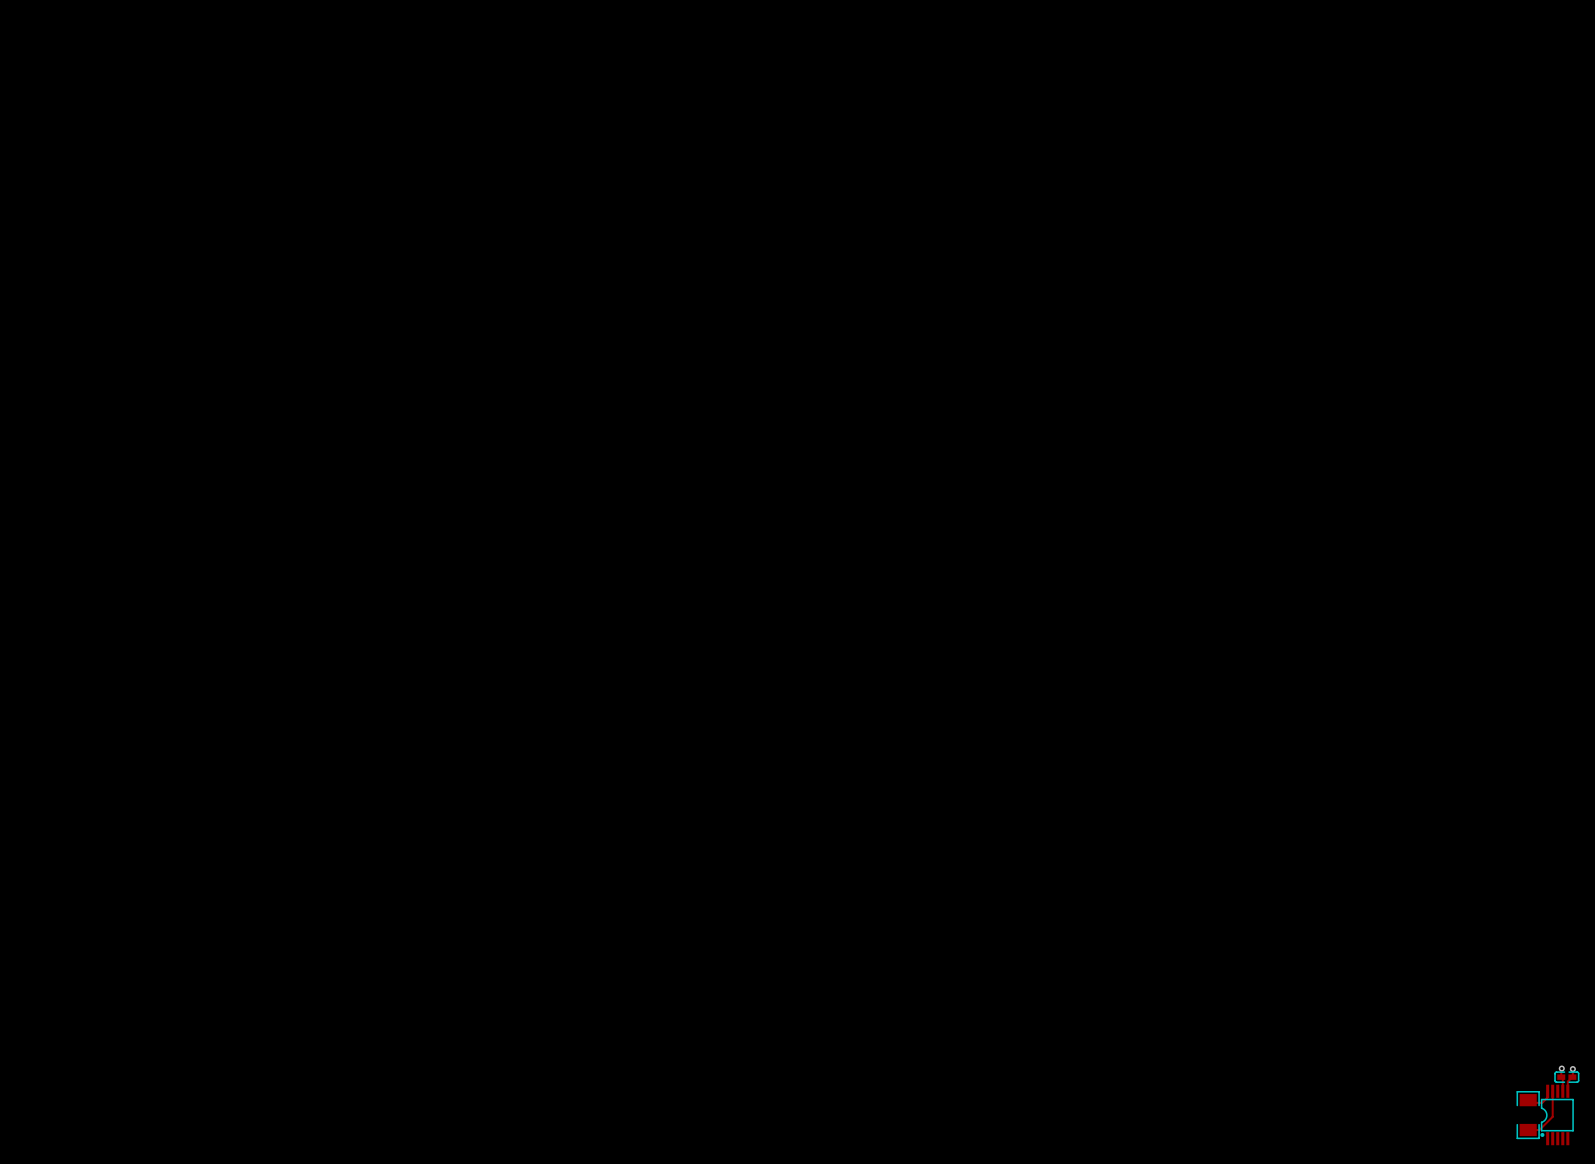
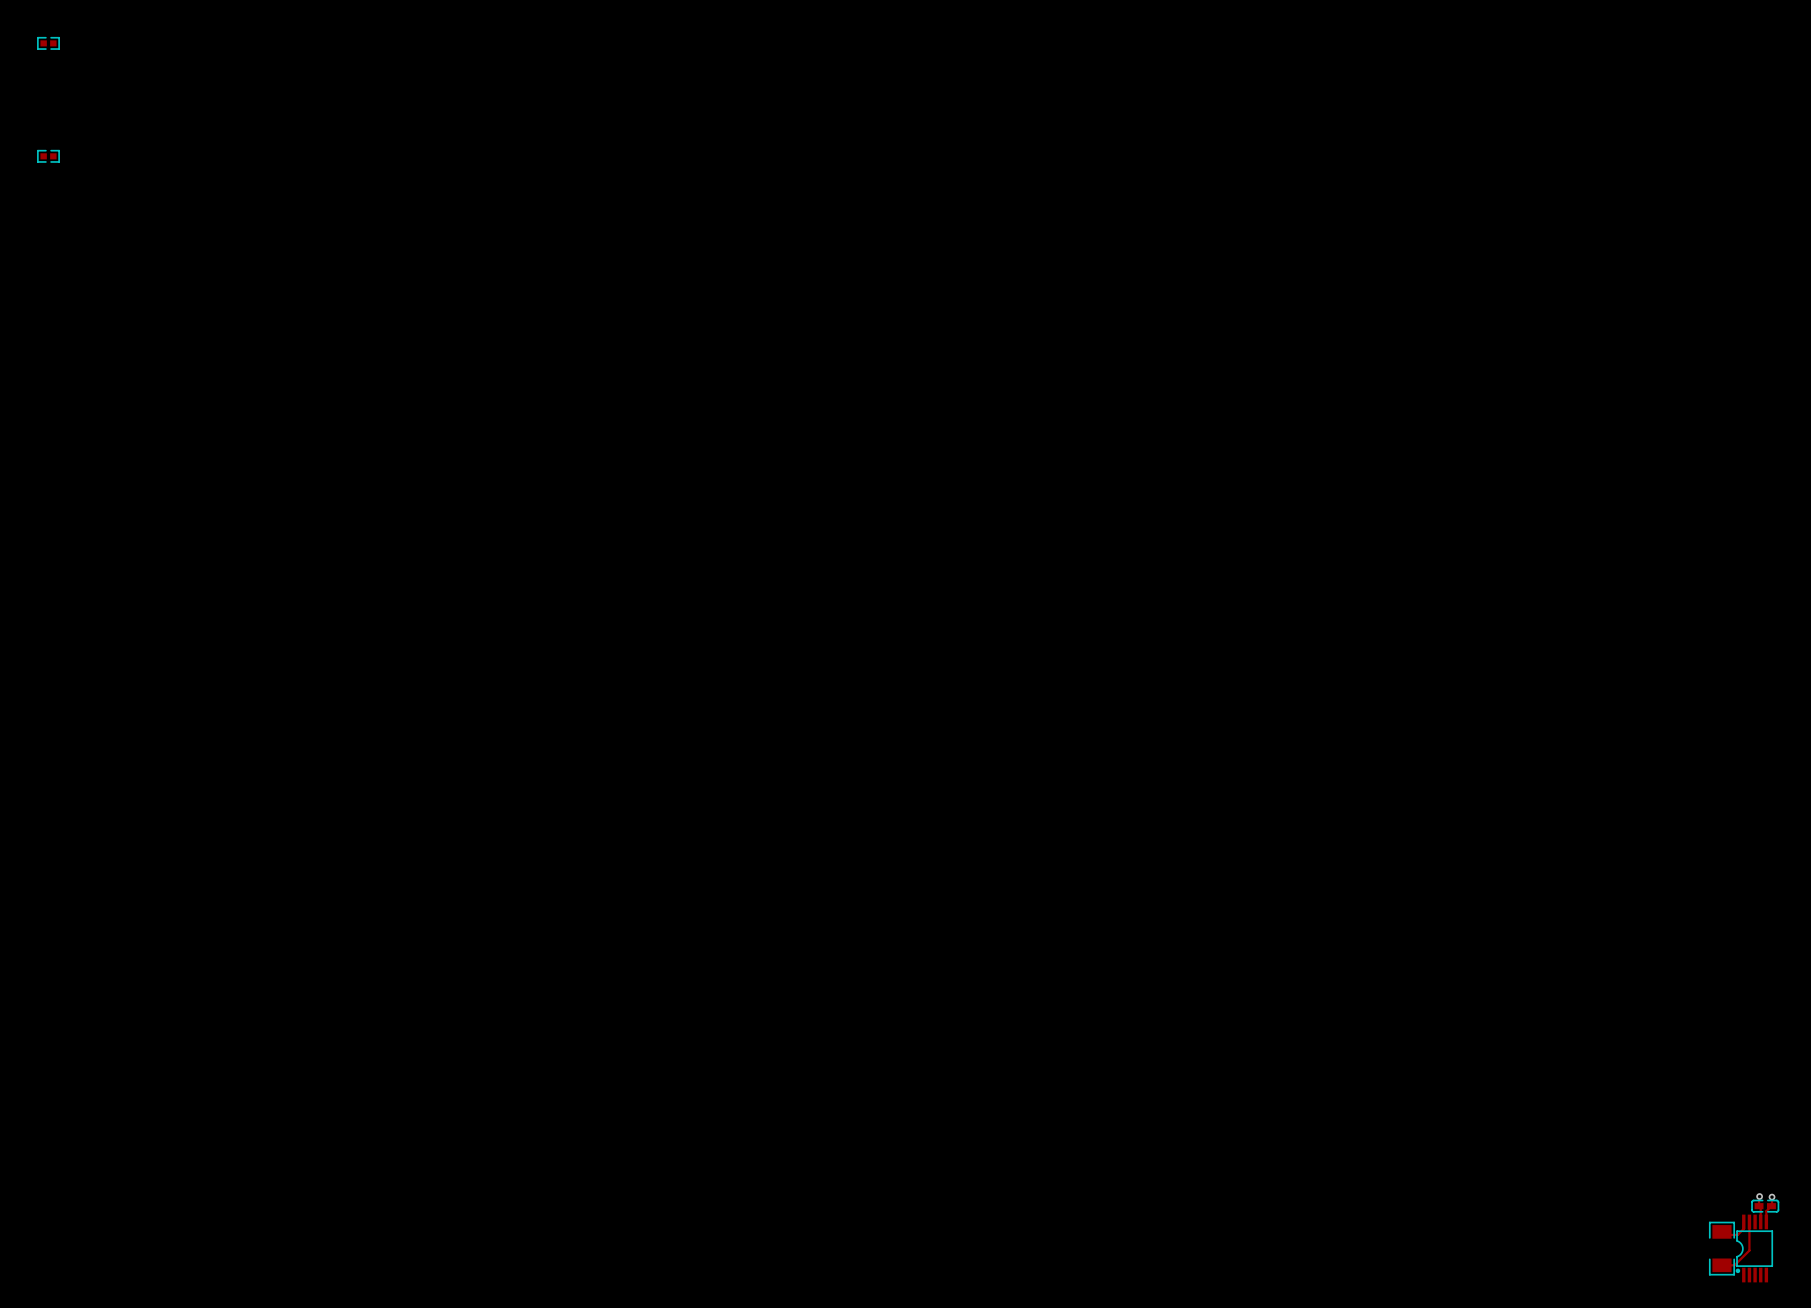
part: none -> (48, 43)
part: none -> (48, 156)

